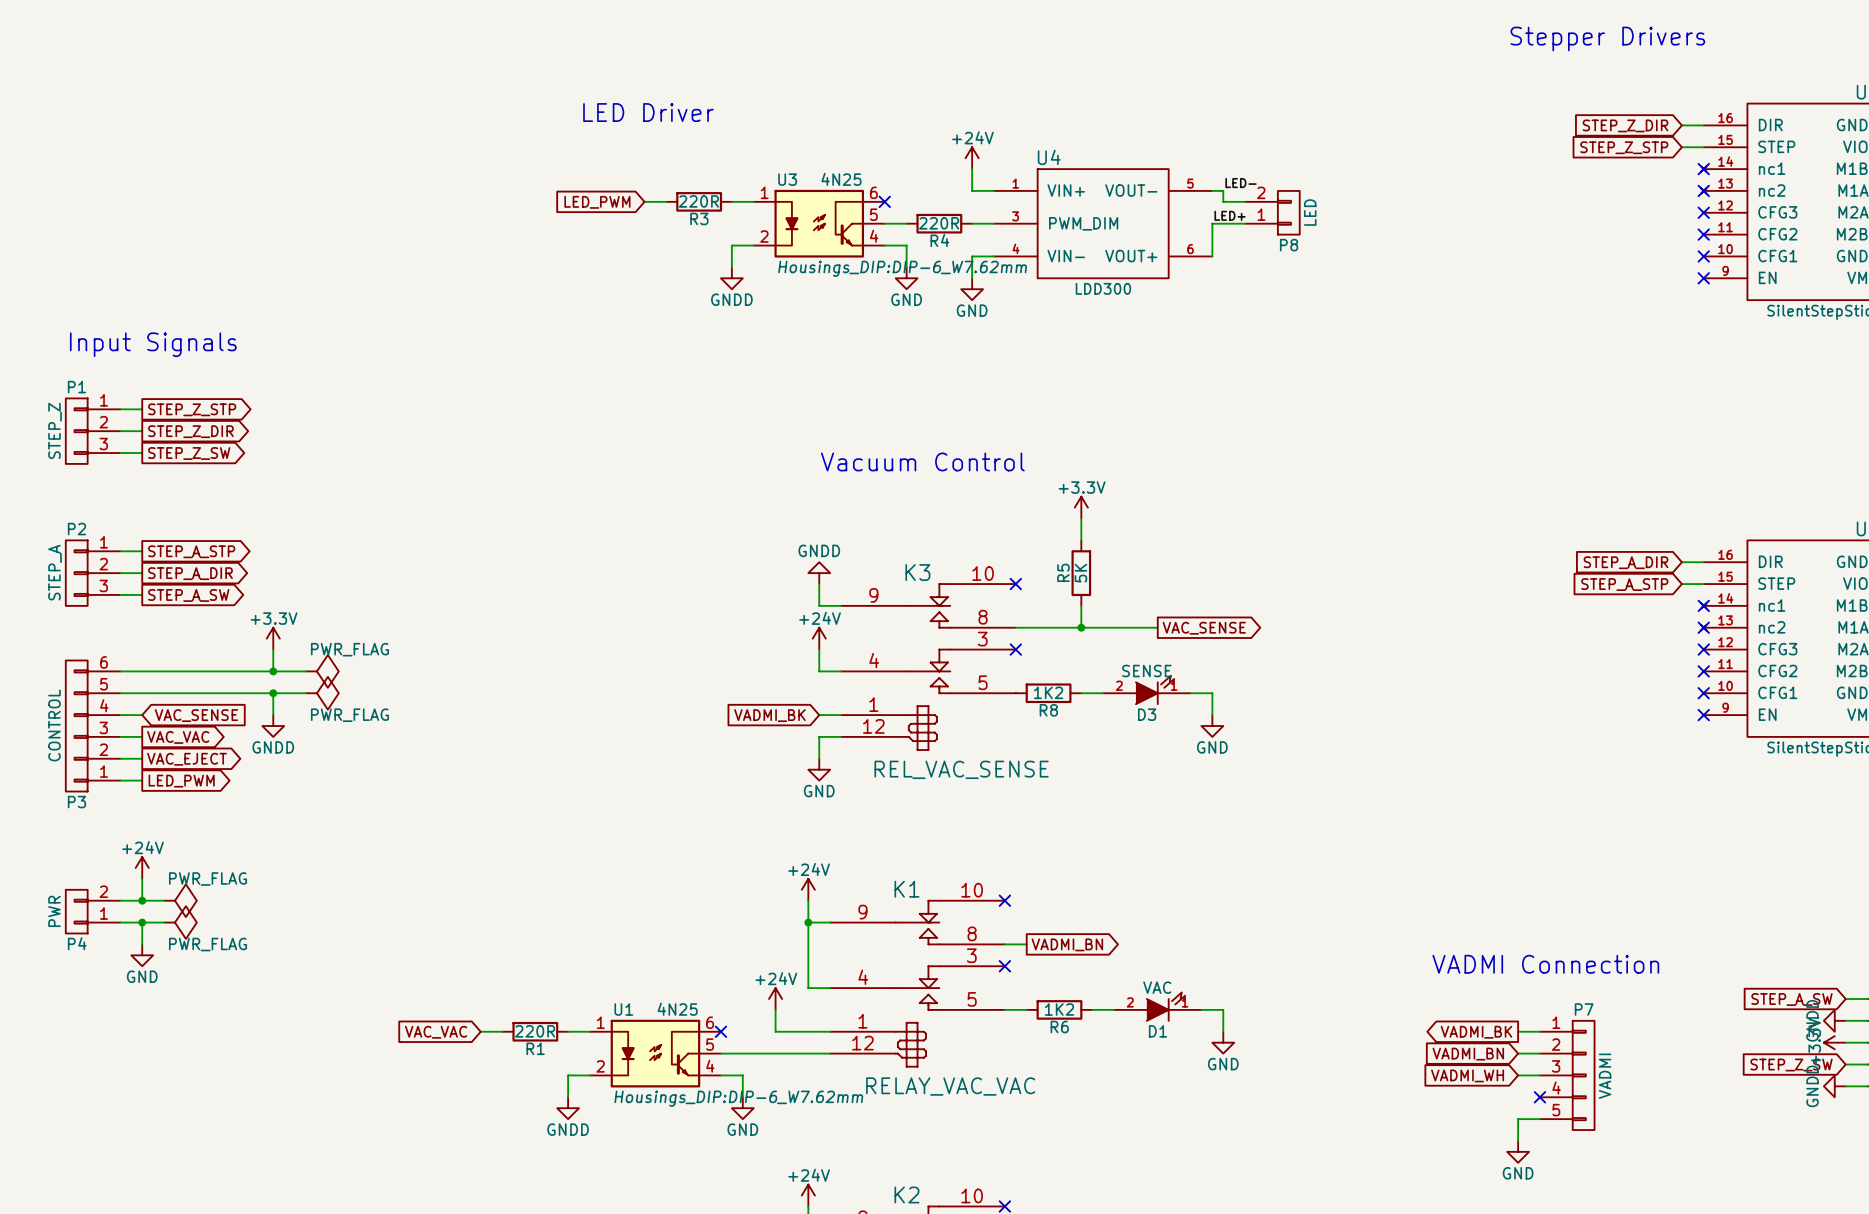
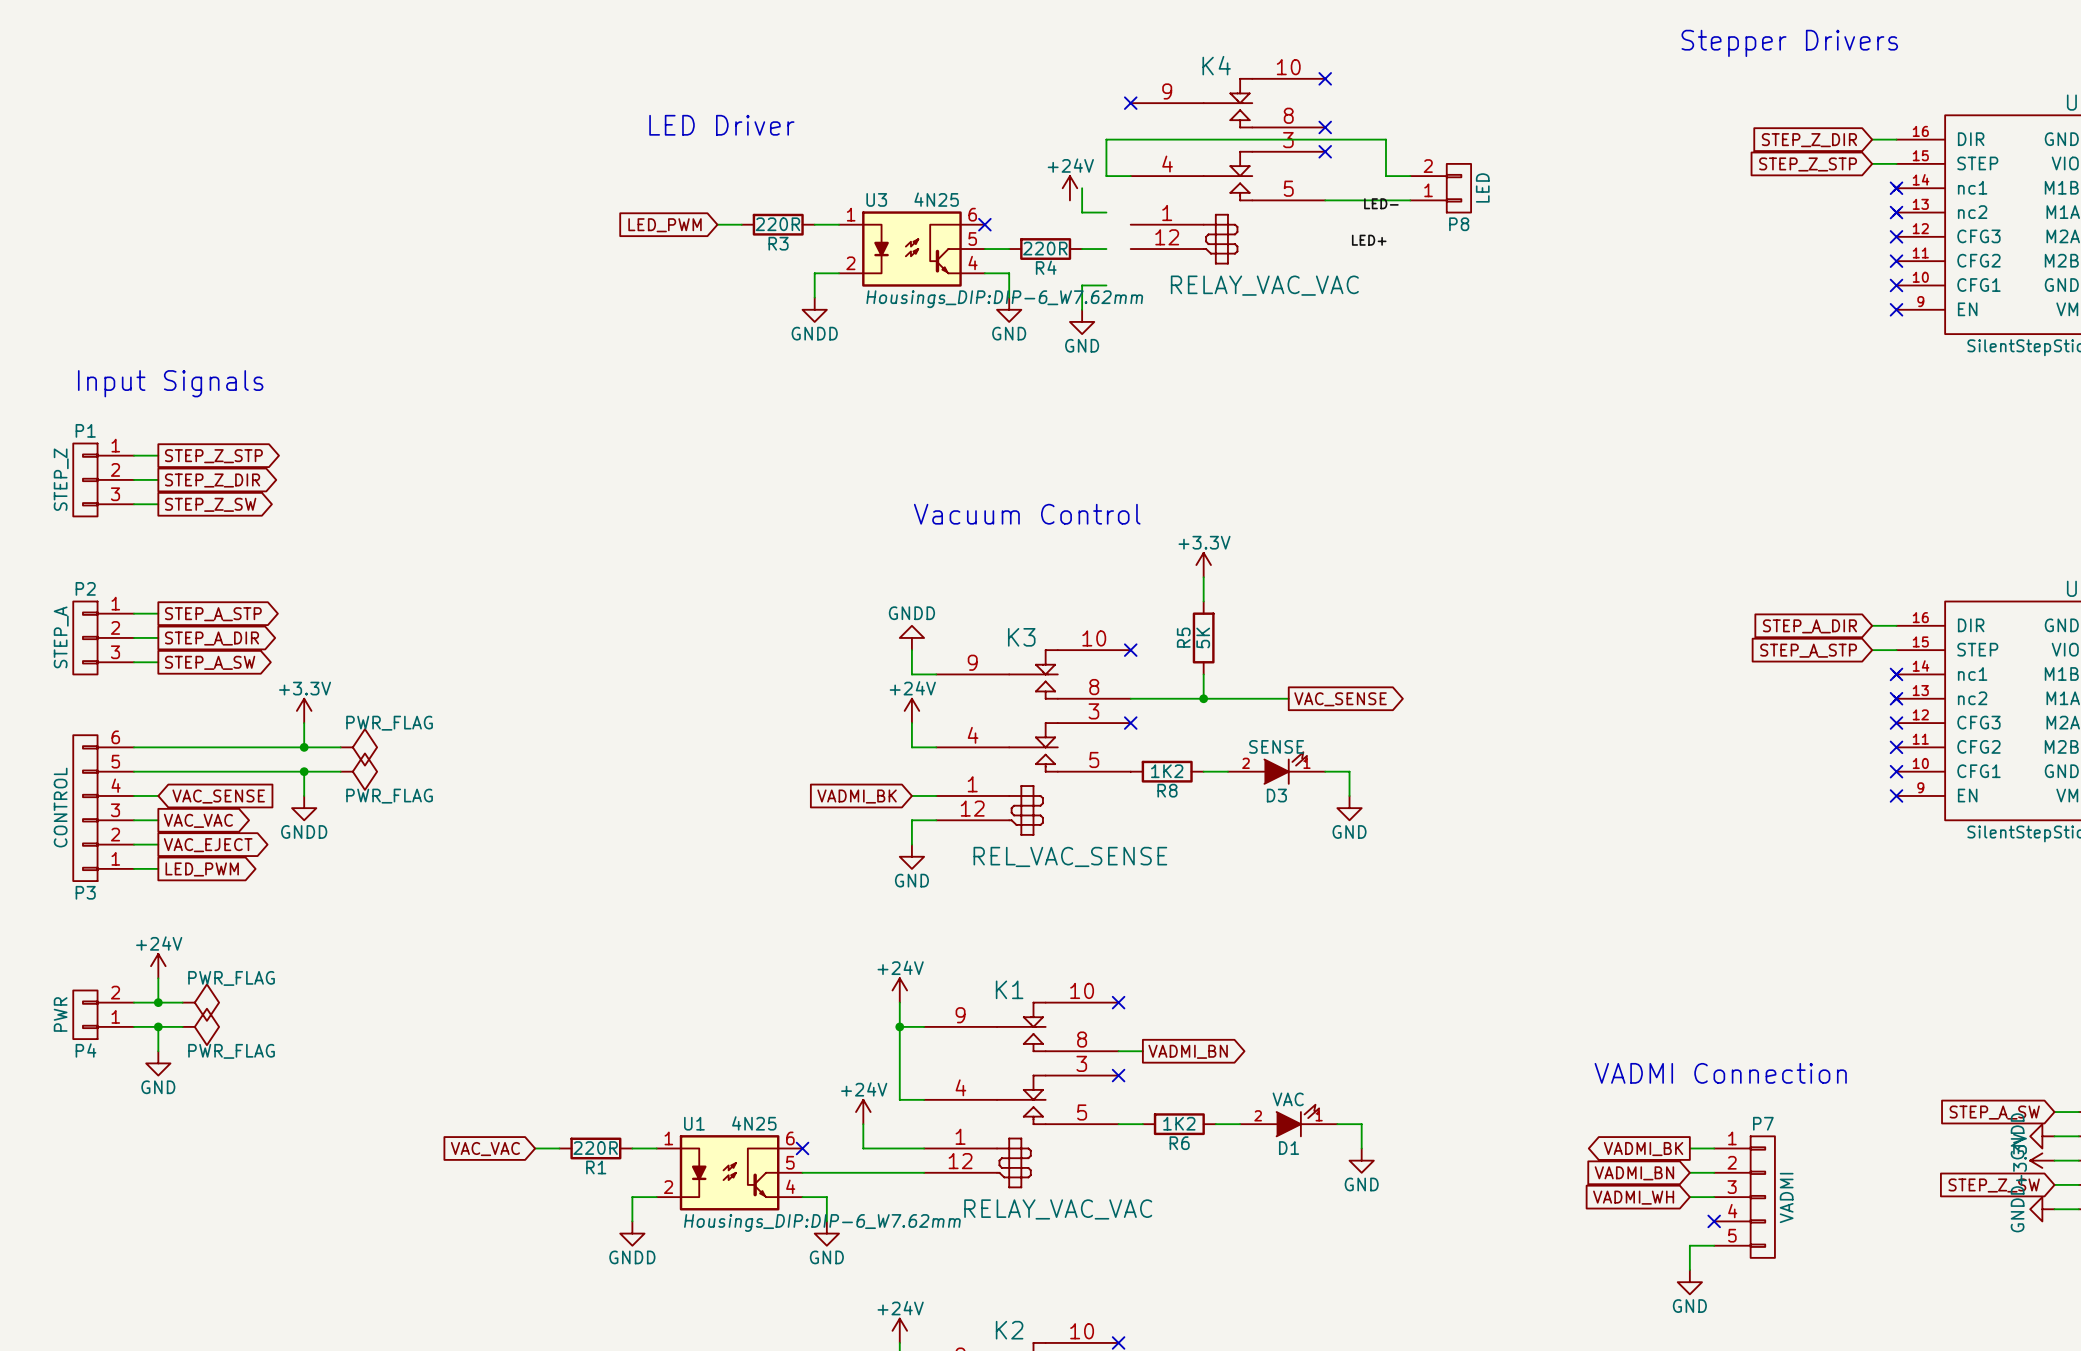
no-connect mark: none -> (1325, 78)
no-connect mark: none -> (1130, 103)
no-connect mark: none -> (1325, 127)
no-connect mark: none -> (1325, 151)
K4: none -> RELAY_VAC_VAC (1227, 171)
power symbol position: +24V (972, 158) -> +24V (1069, 188)
wire: none -> (1130, 176) (1106, 176) (1106, 139) (1385, 139) (1385, 176) (1410, 176)
wire: none -> (1325, 200) (1410, 200)
wire: (1212, 190) (1223, 190) (1223, 201) (1245, 201) -> none
P8 position: (1272, 212) -> (1440, 188)
U4: LDD300 (1103, 223) -> none
wire: (1245, 223) (1212, 223) (1212, 256) -> none

